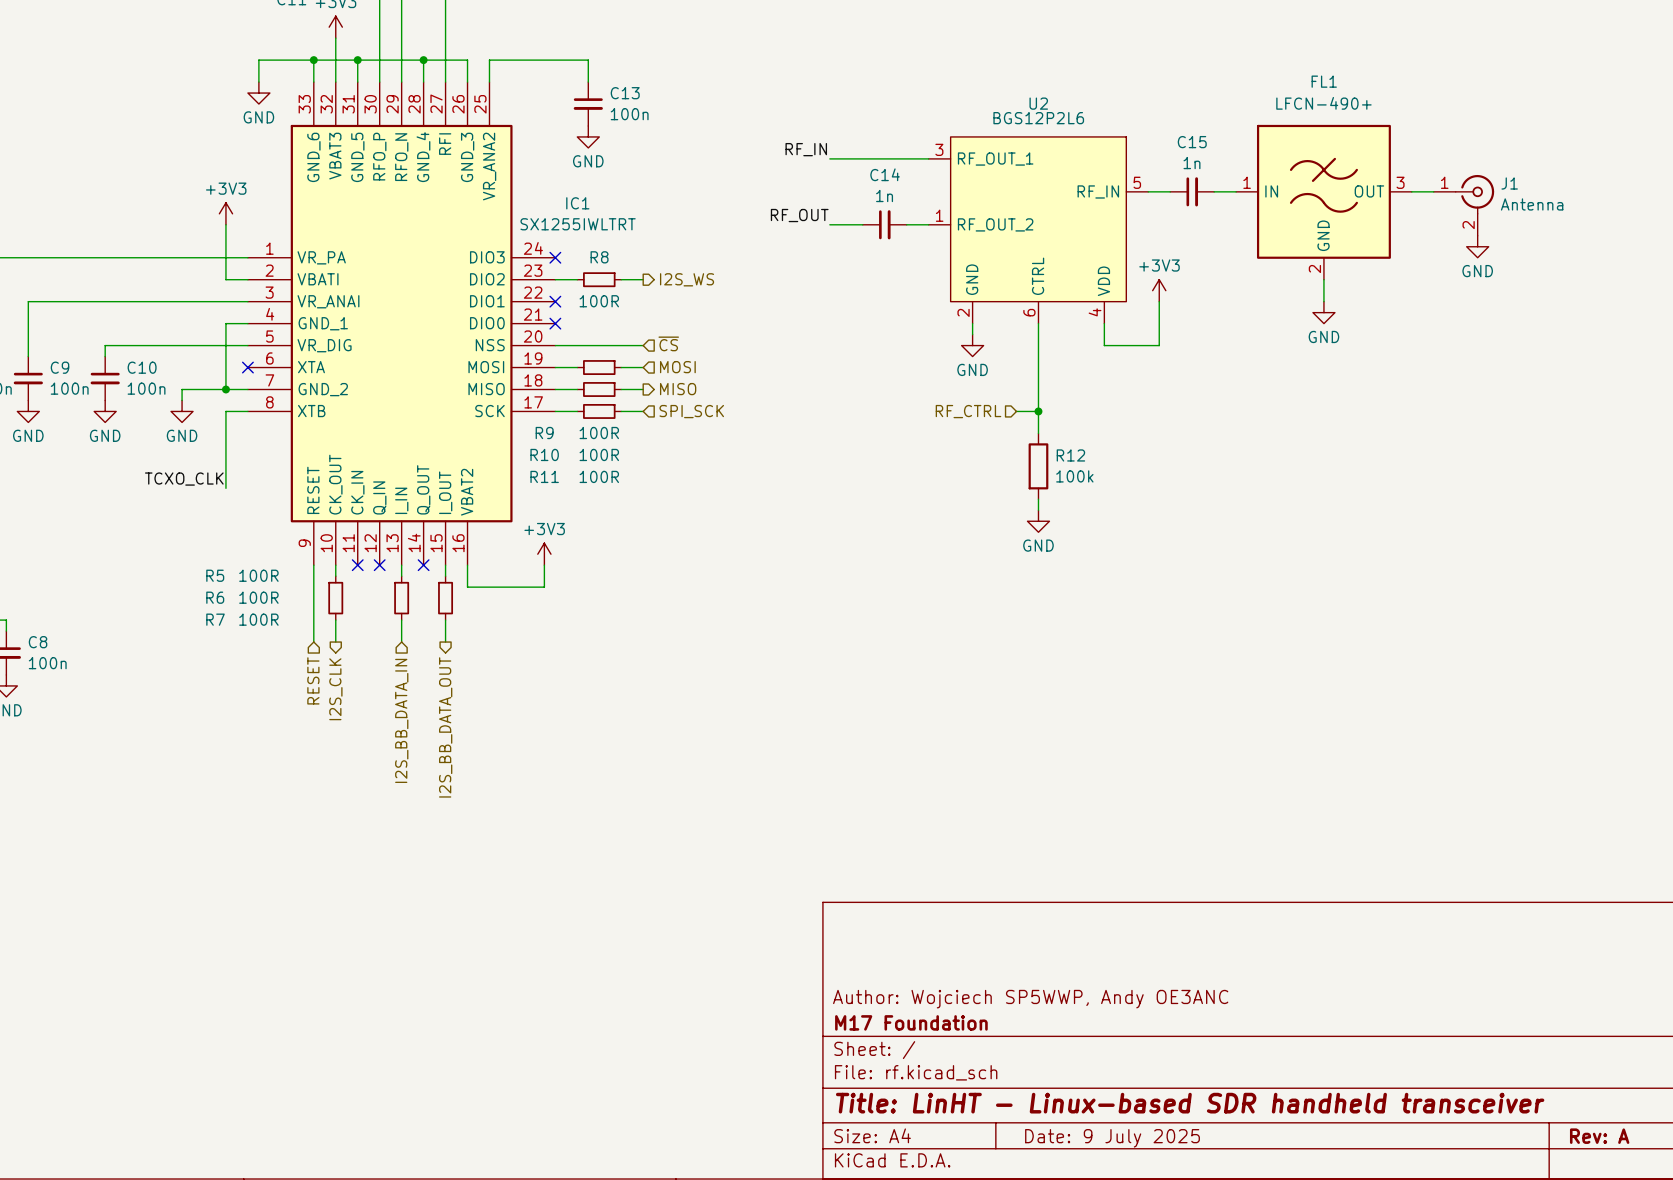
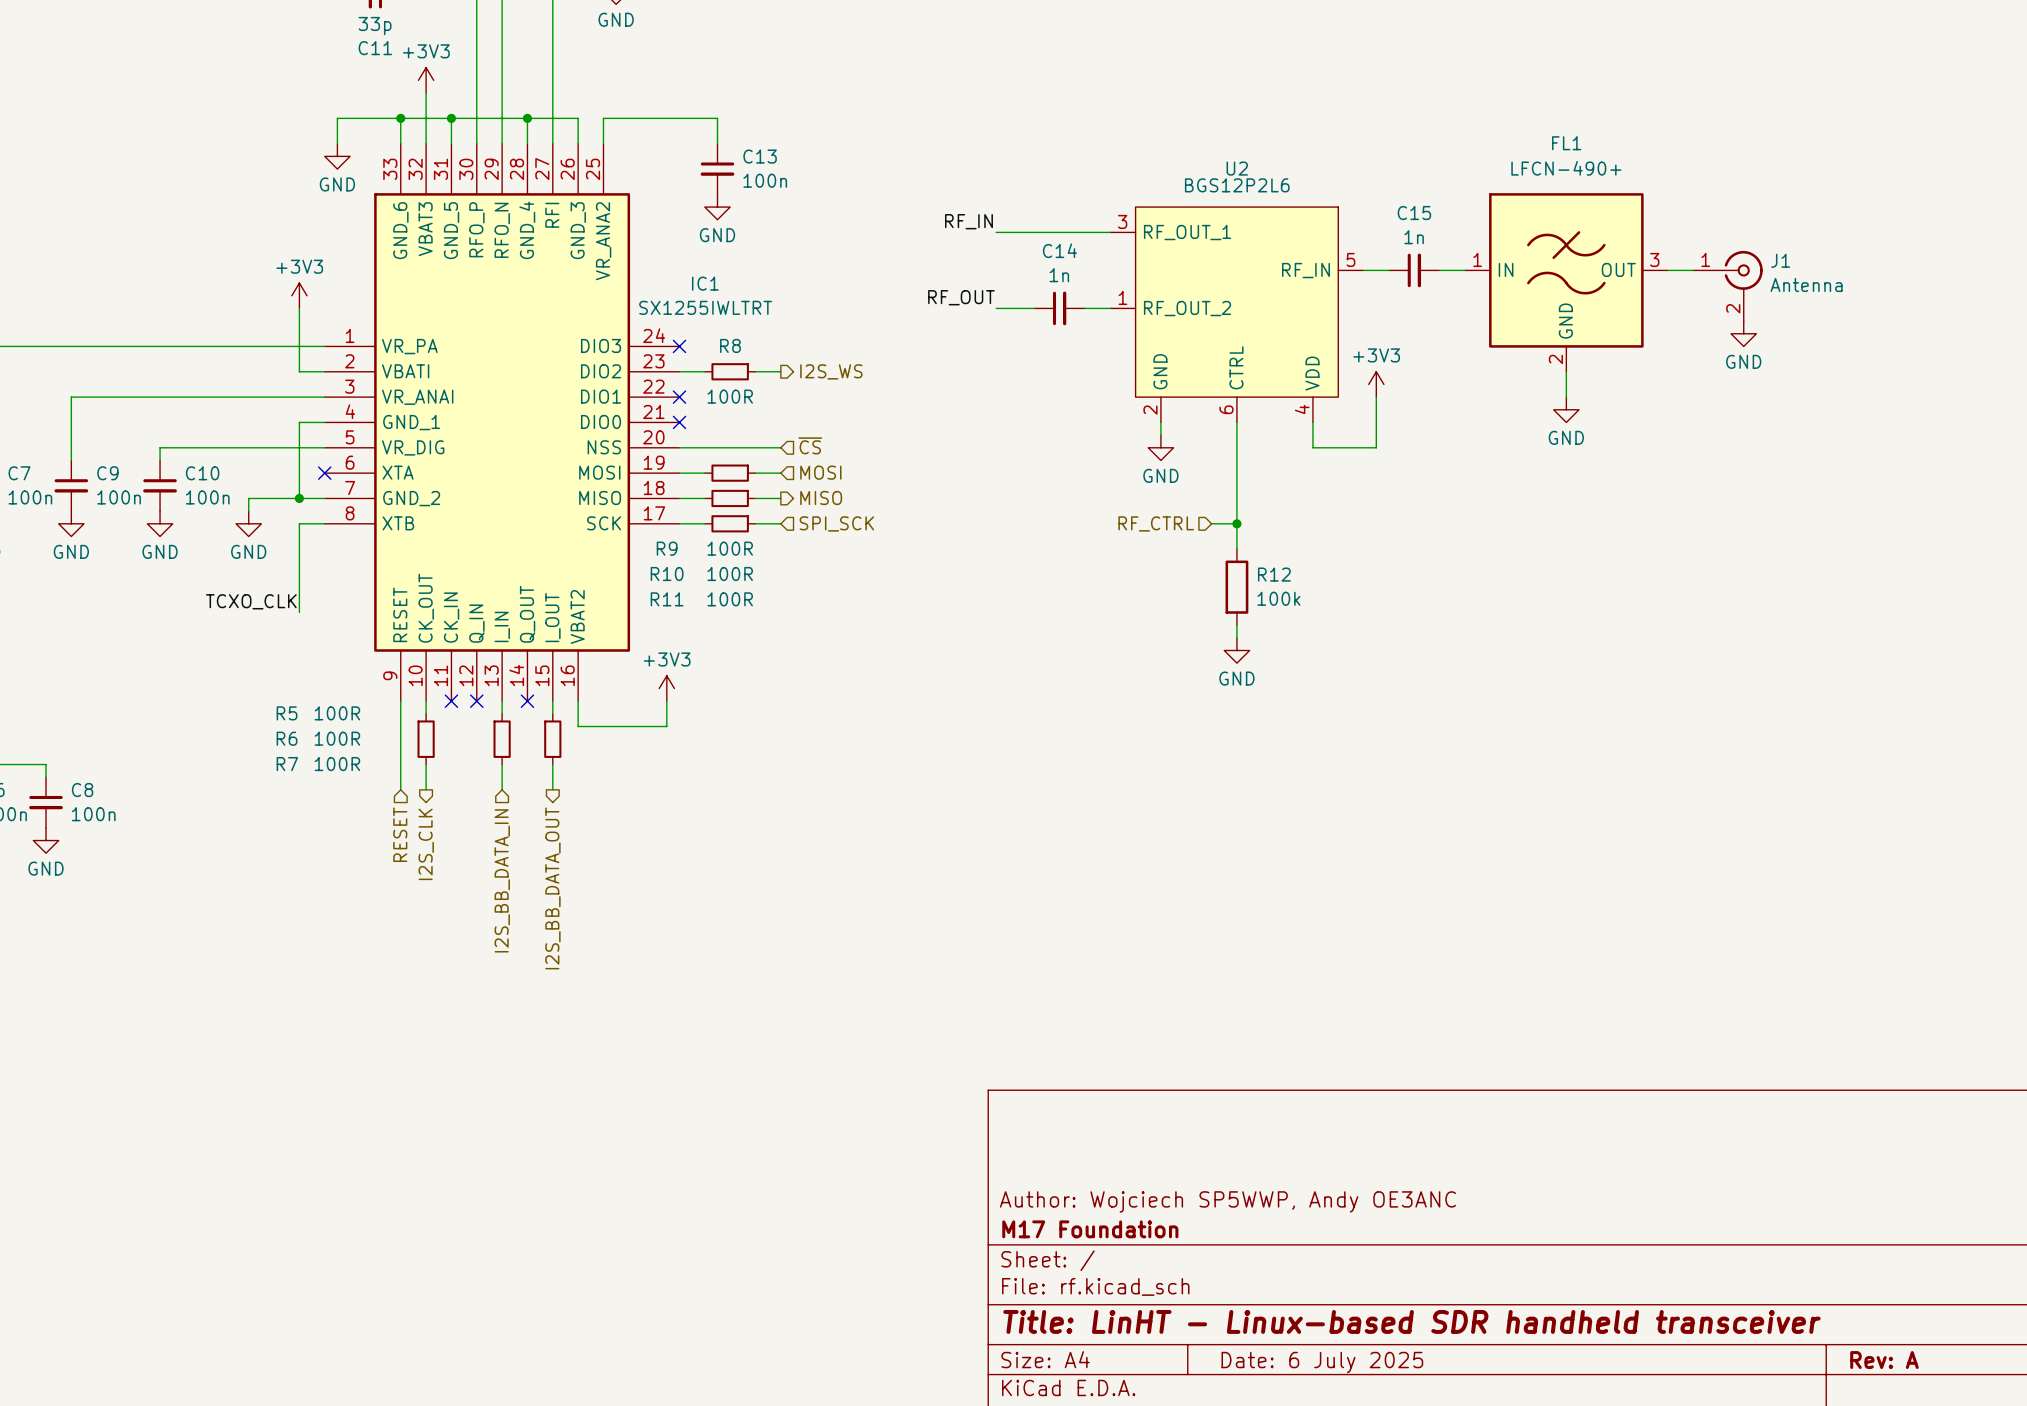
title block: Date: 9 July 2025 (1112, 1138) -> Date: 6 July 2025 (1322, 1362)

